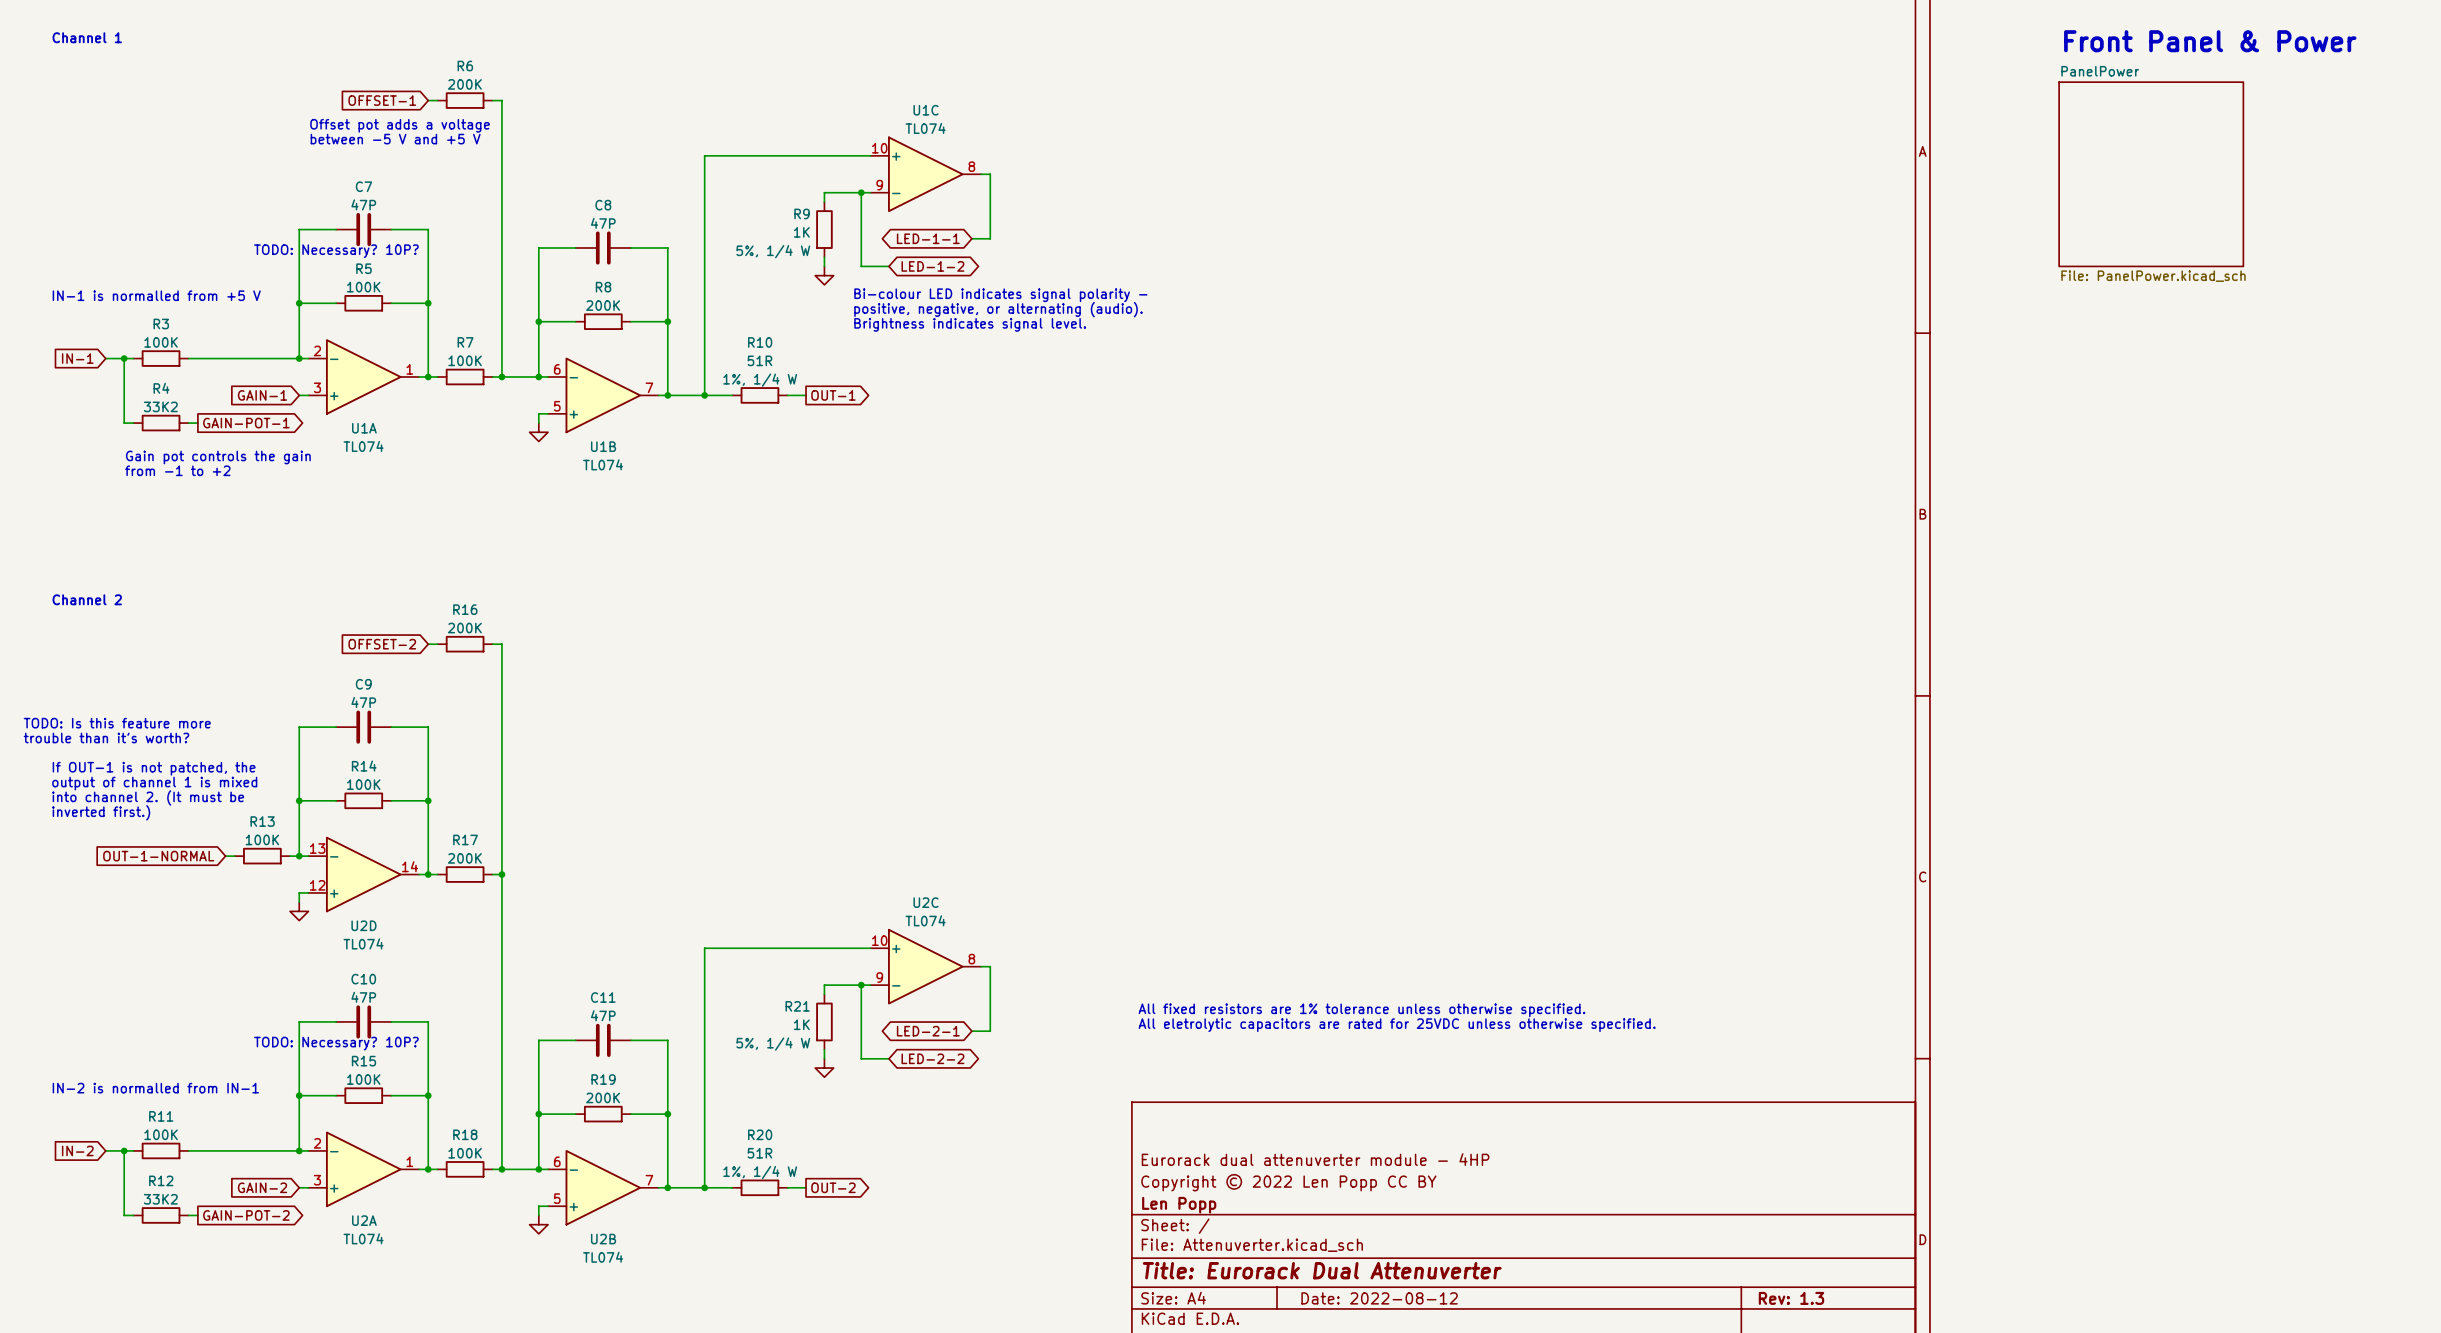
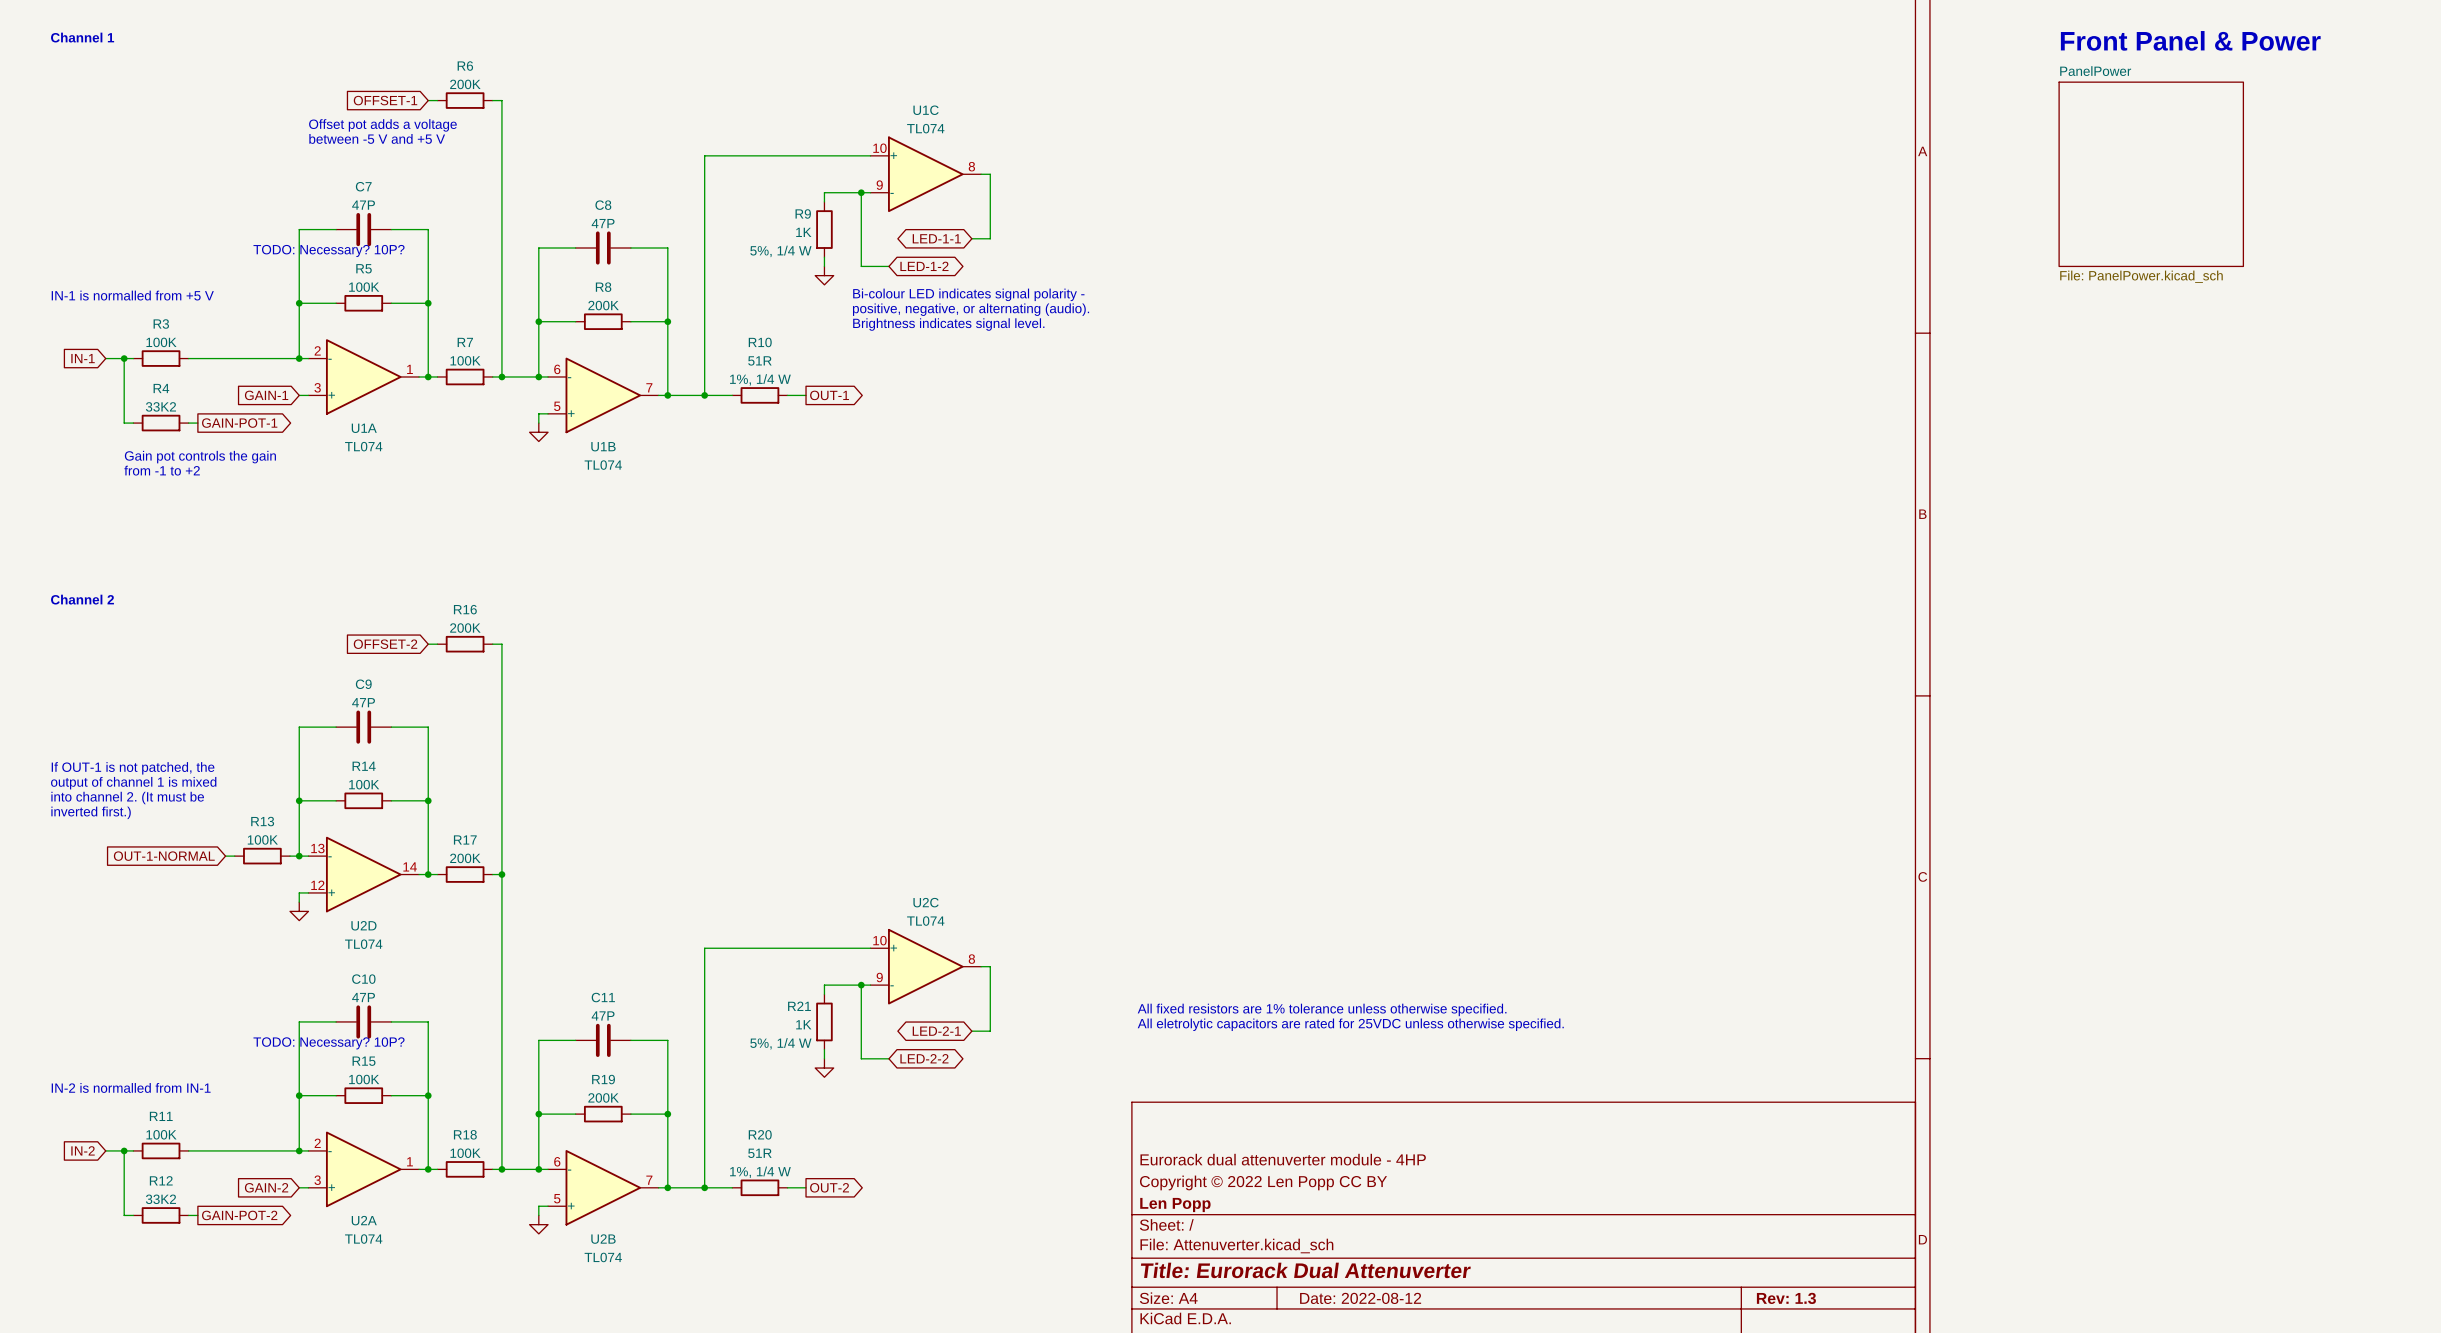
text: TODO: Is this feature more (117, 723) -> none
text: trouble than it's worth? (106, 738) -> none

